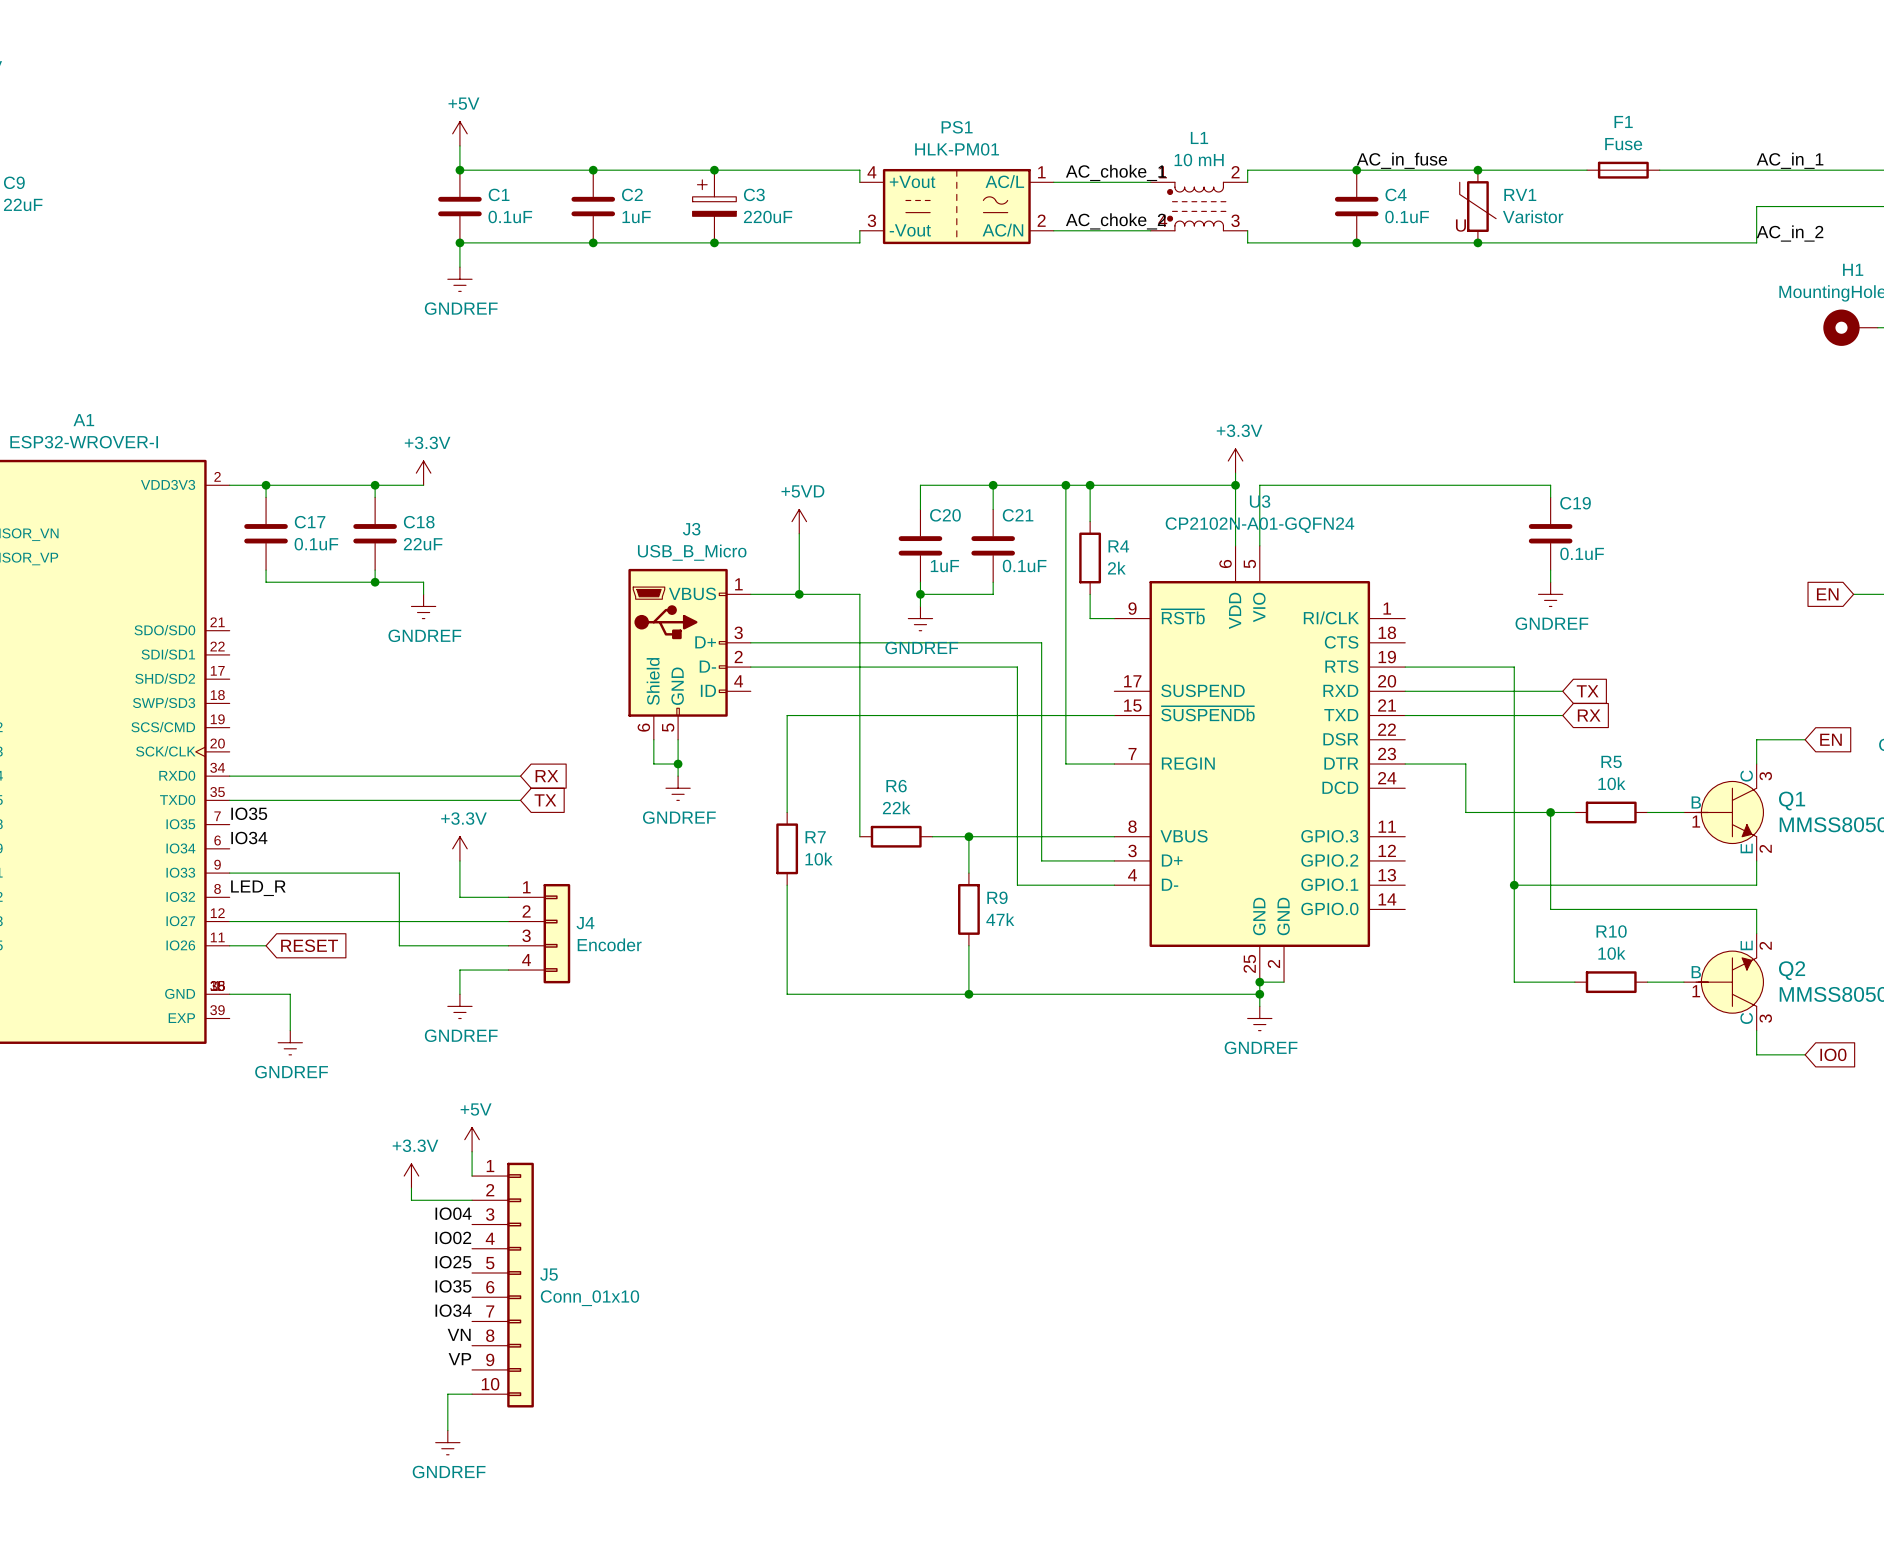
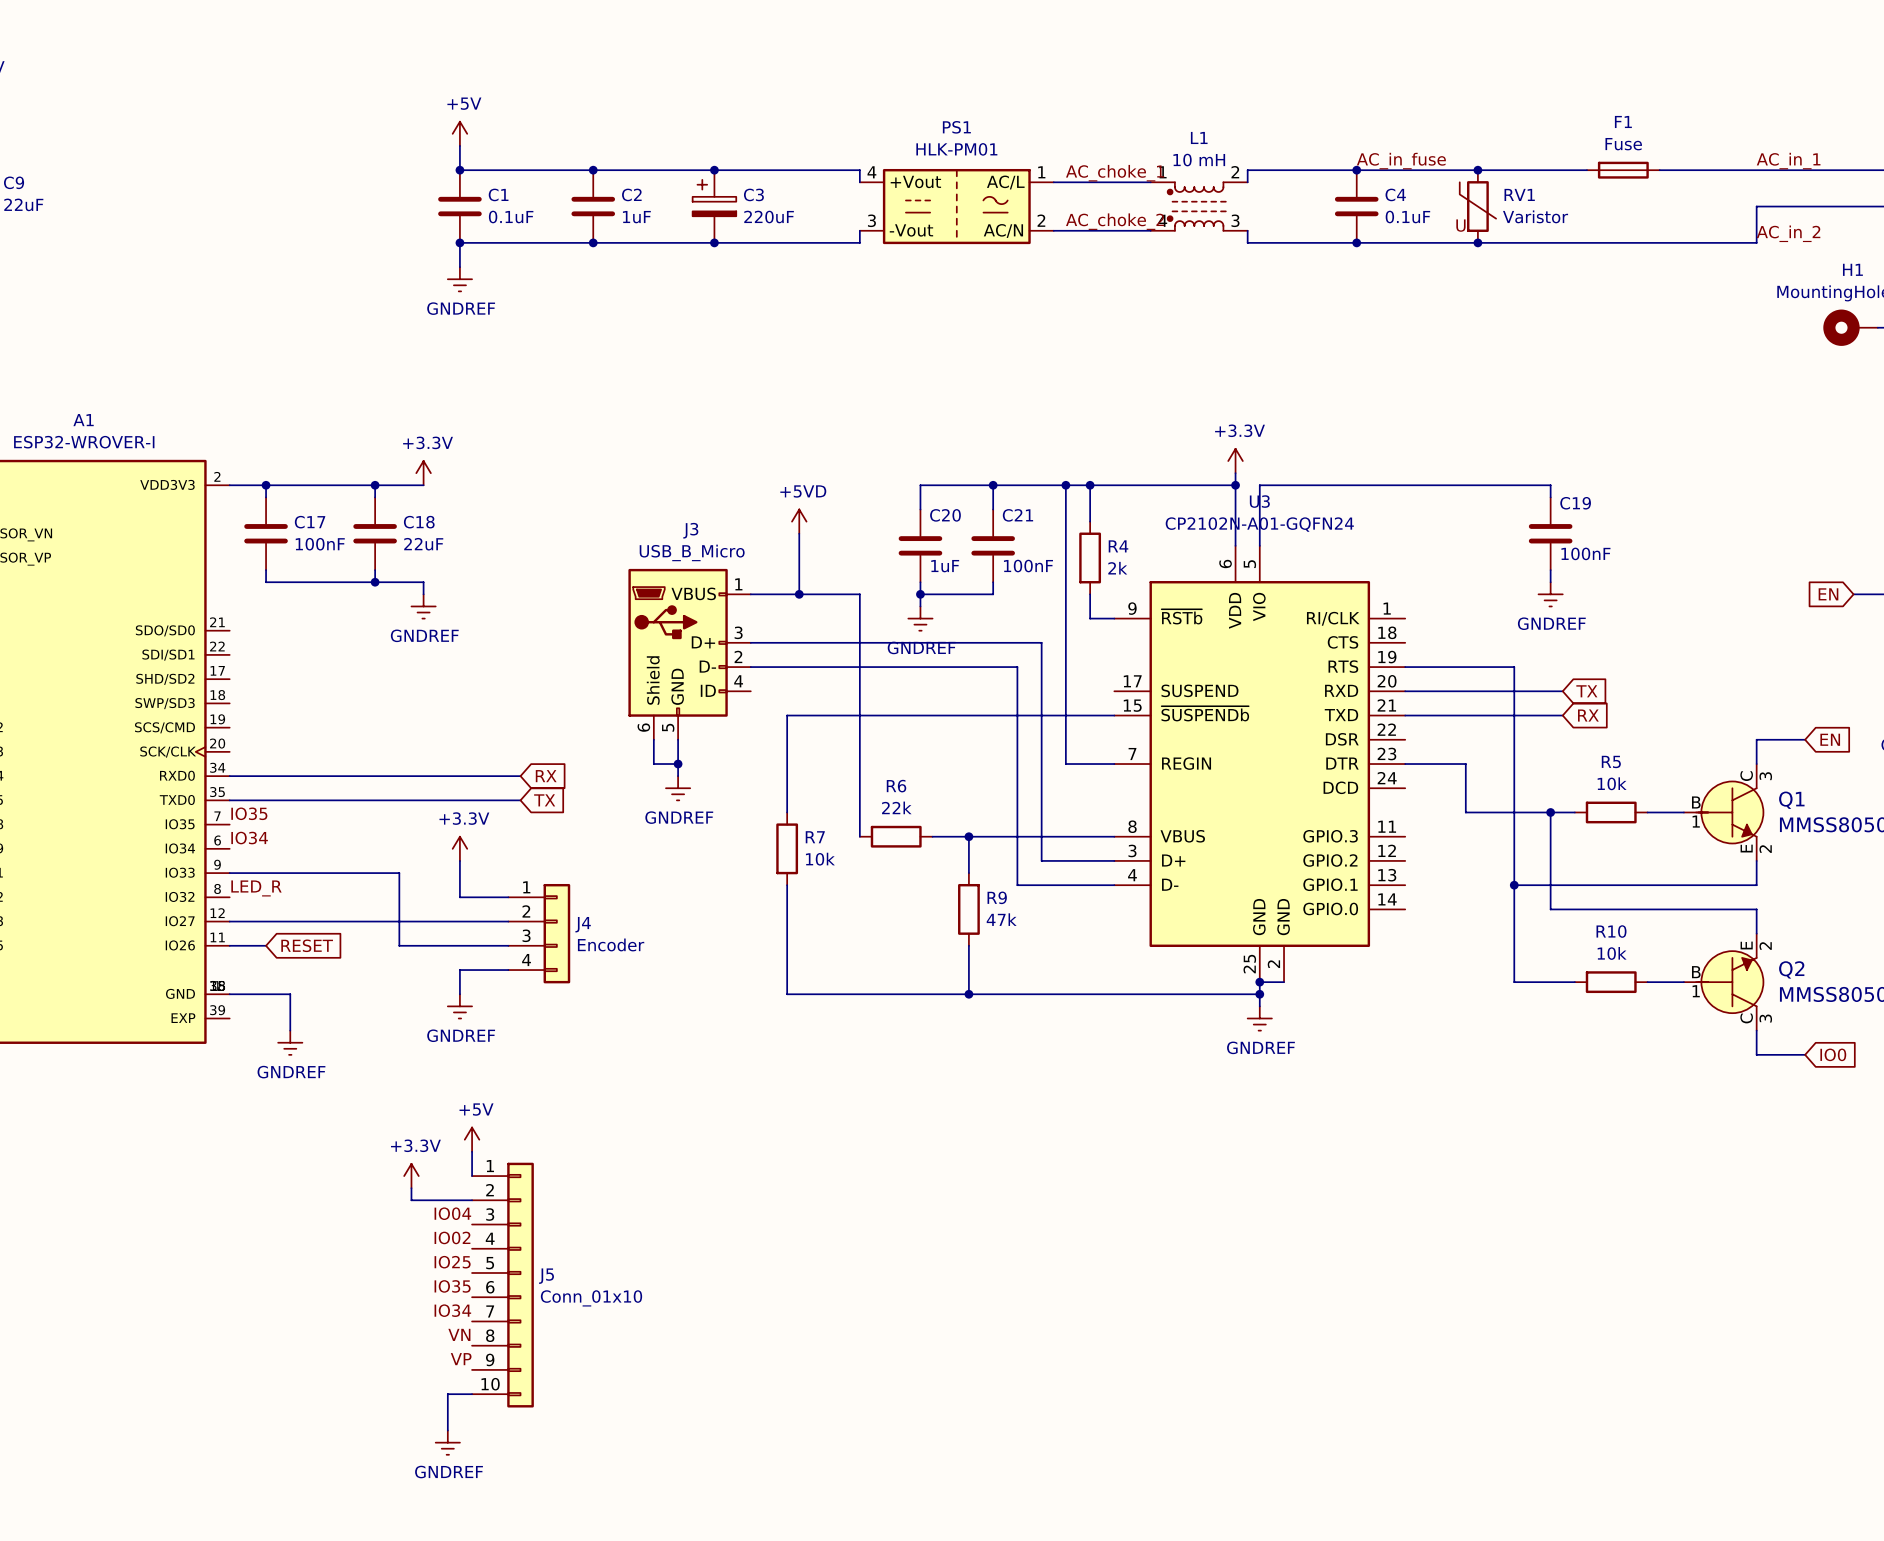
C17 value: 0.1uF (316, 544) -> 100nF (320, 544)
C19 value: 0.1uF (1582, 553) -> 100nF (1585, 553)
C21 value: 0.1uF (1024, 566) -> 100nF (1028, 566)

